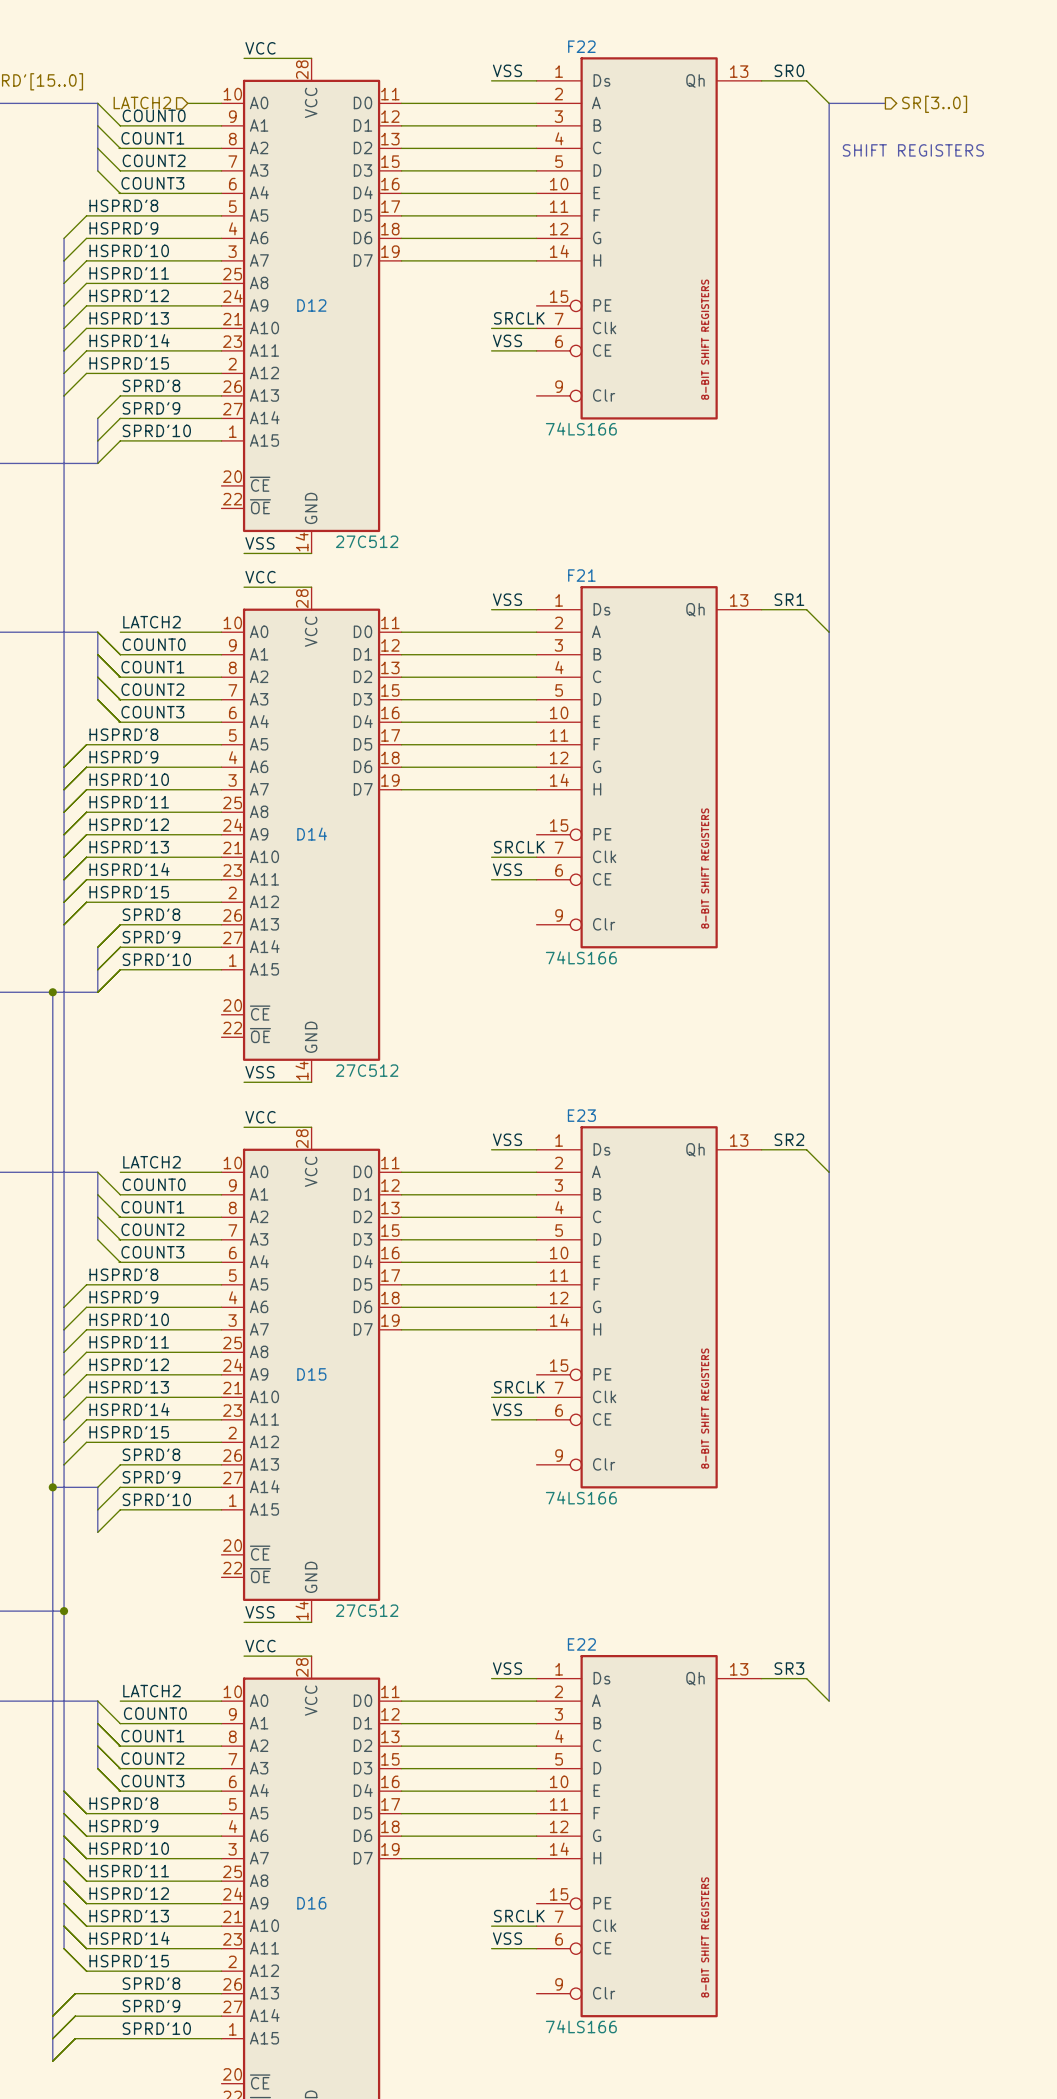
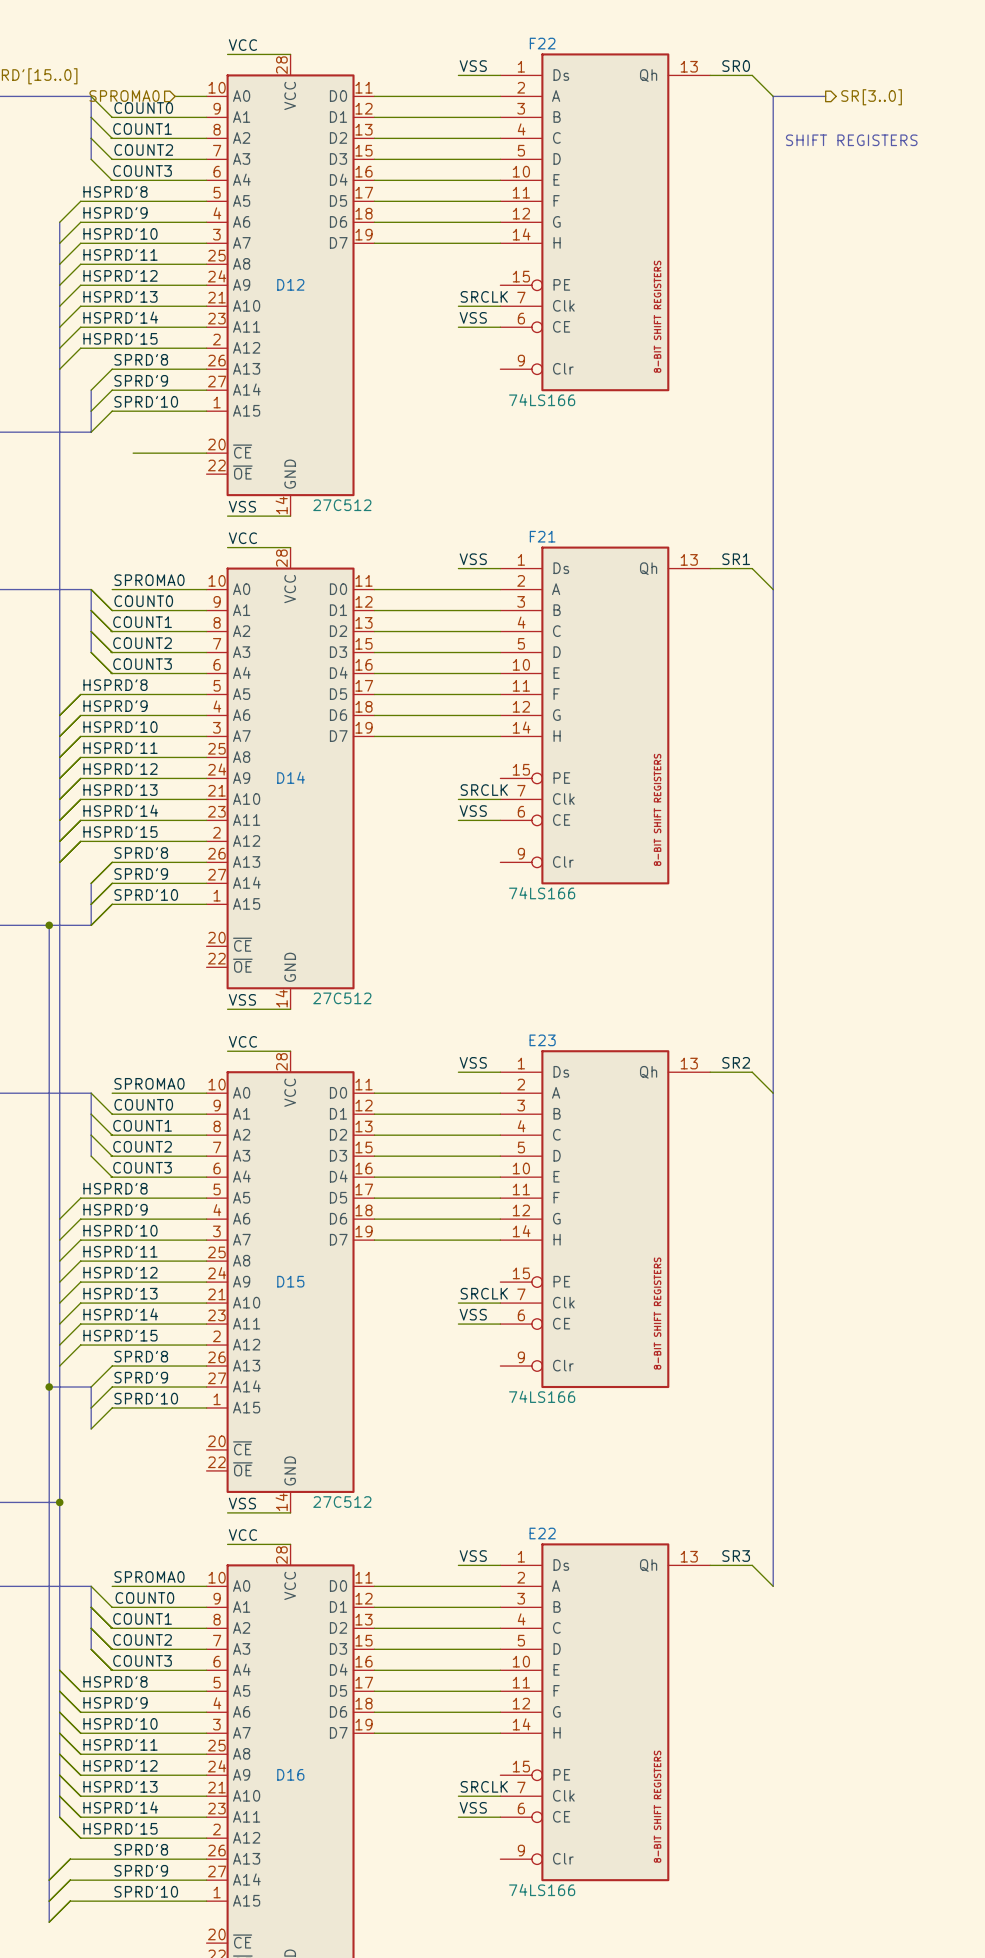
hierarchical label: LATCH2 (142, 102) -> SPROMA0 (124, 96)
wire: none -> (133, 453) (206, 453)
label: LATCH2 (151, 622) -> SPROMA0 (149, 580)
label: LATCH2 (151, 1162) -> SPROMA0 (149, 1083)
label: LATCH2 (151, 1691) -> SPROMA0 (149, 1577)

